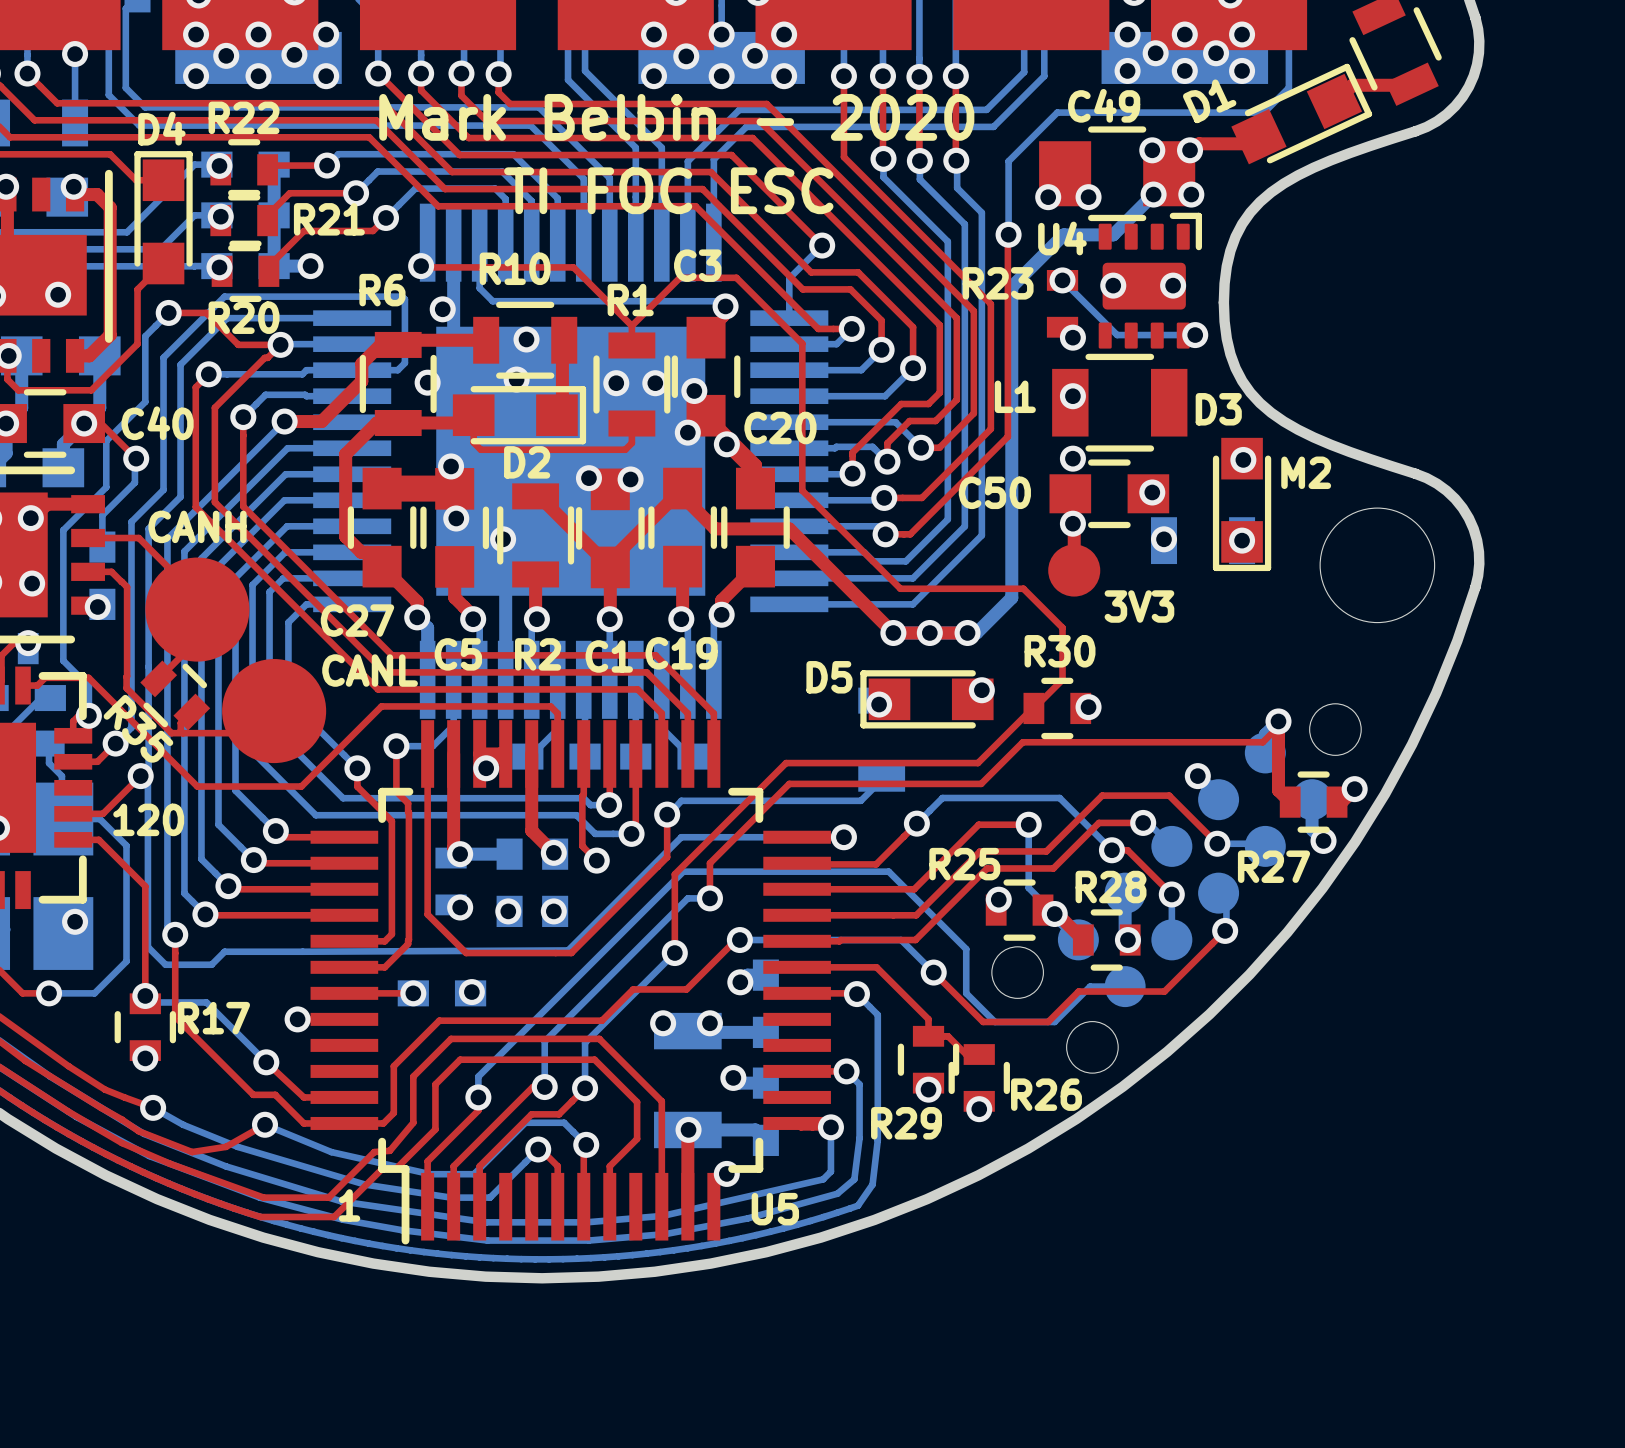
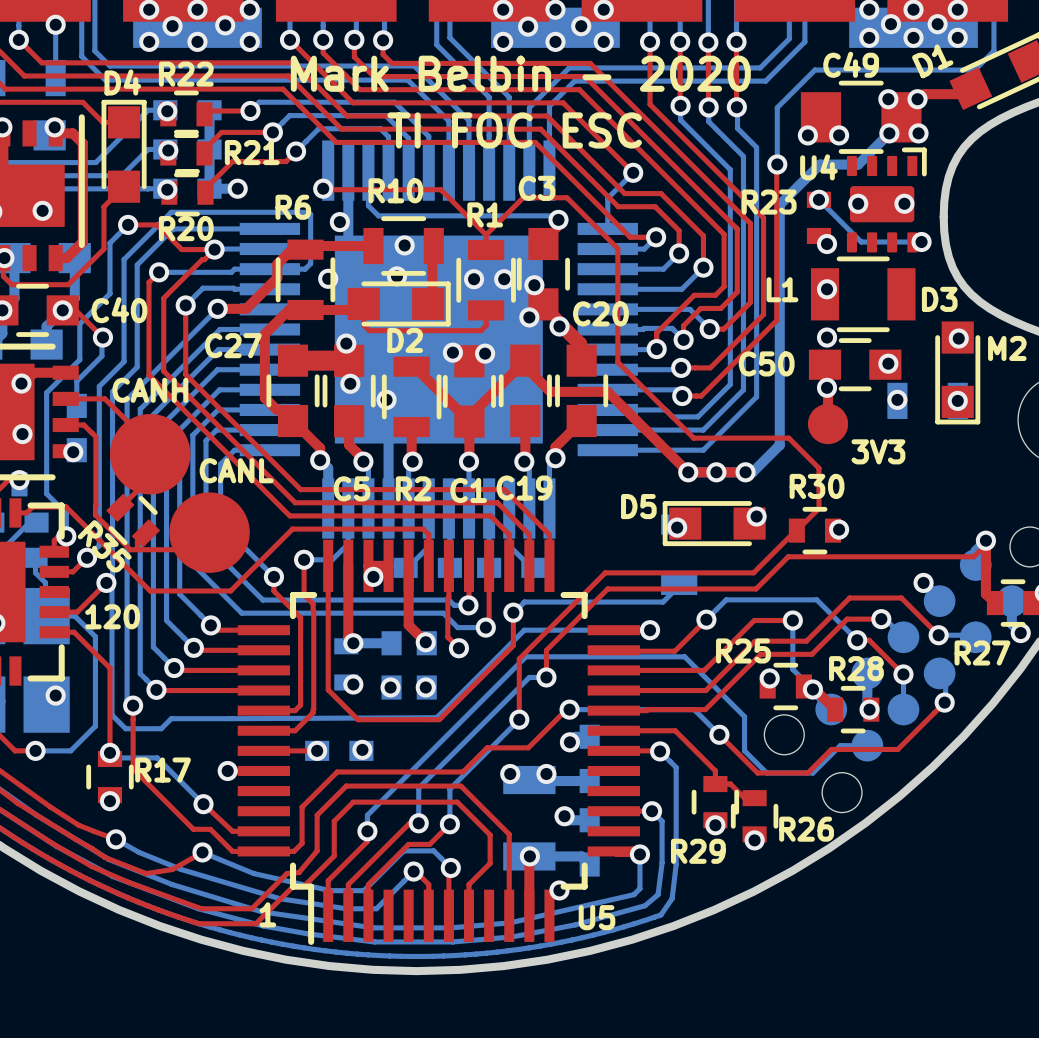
C27 name position: C27 (357, 620) -> C27 (233, 345)
text position: CANL (370, 670) -> CANL (236, 470)

